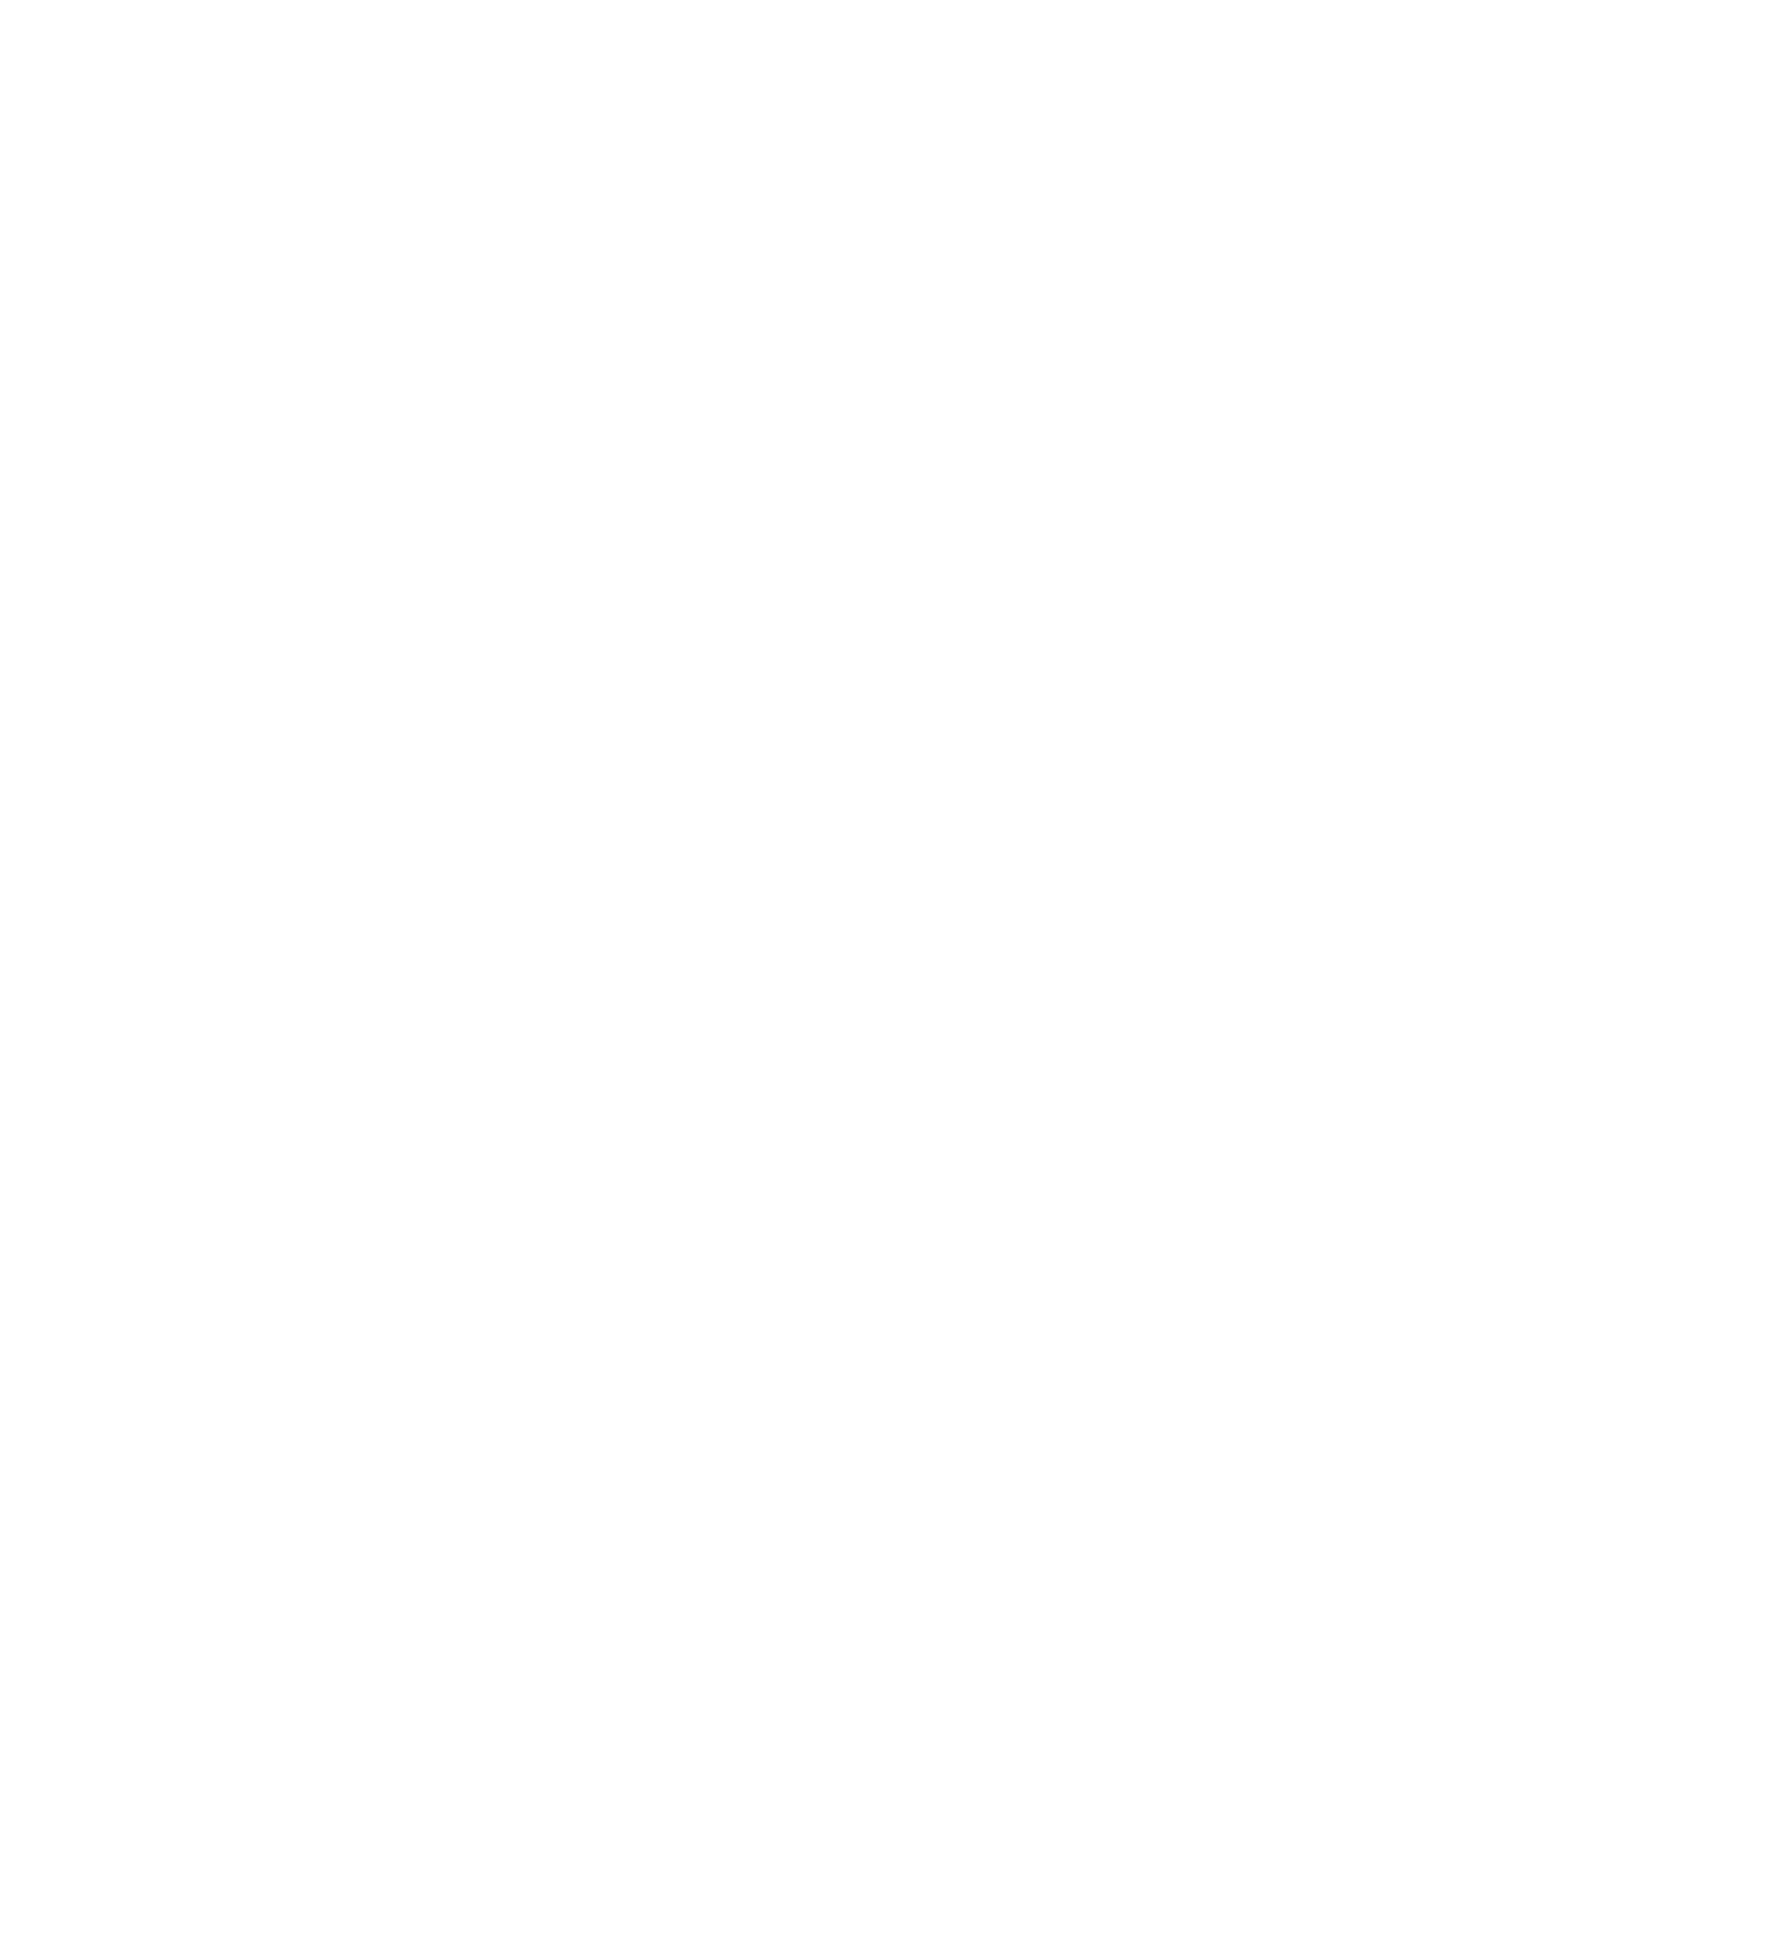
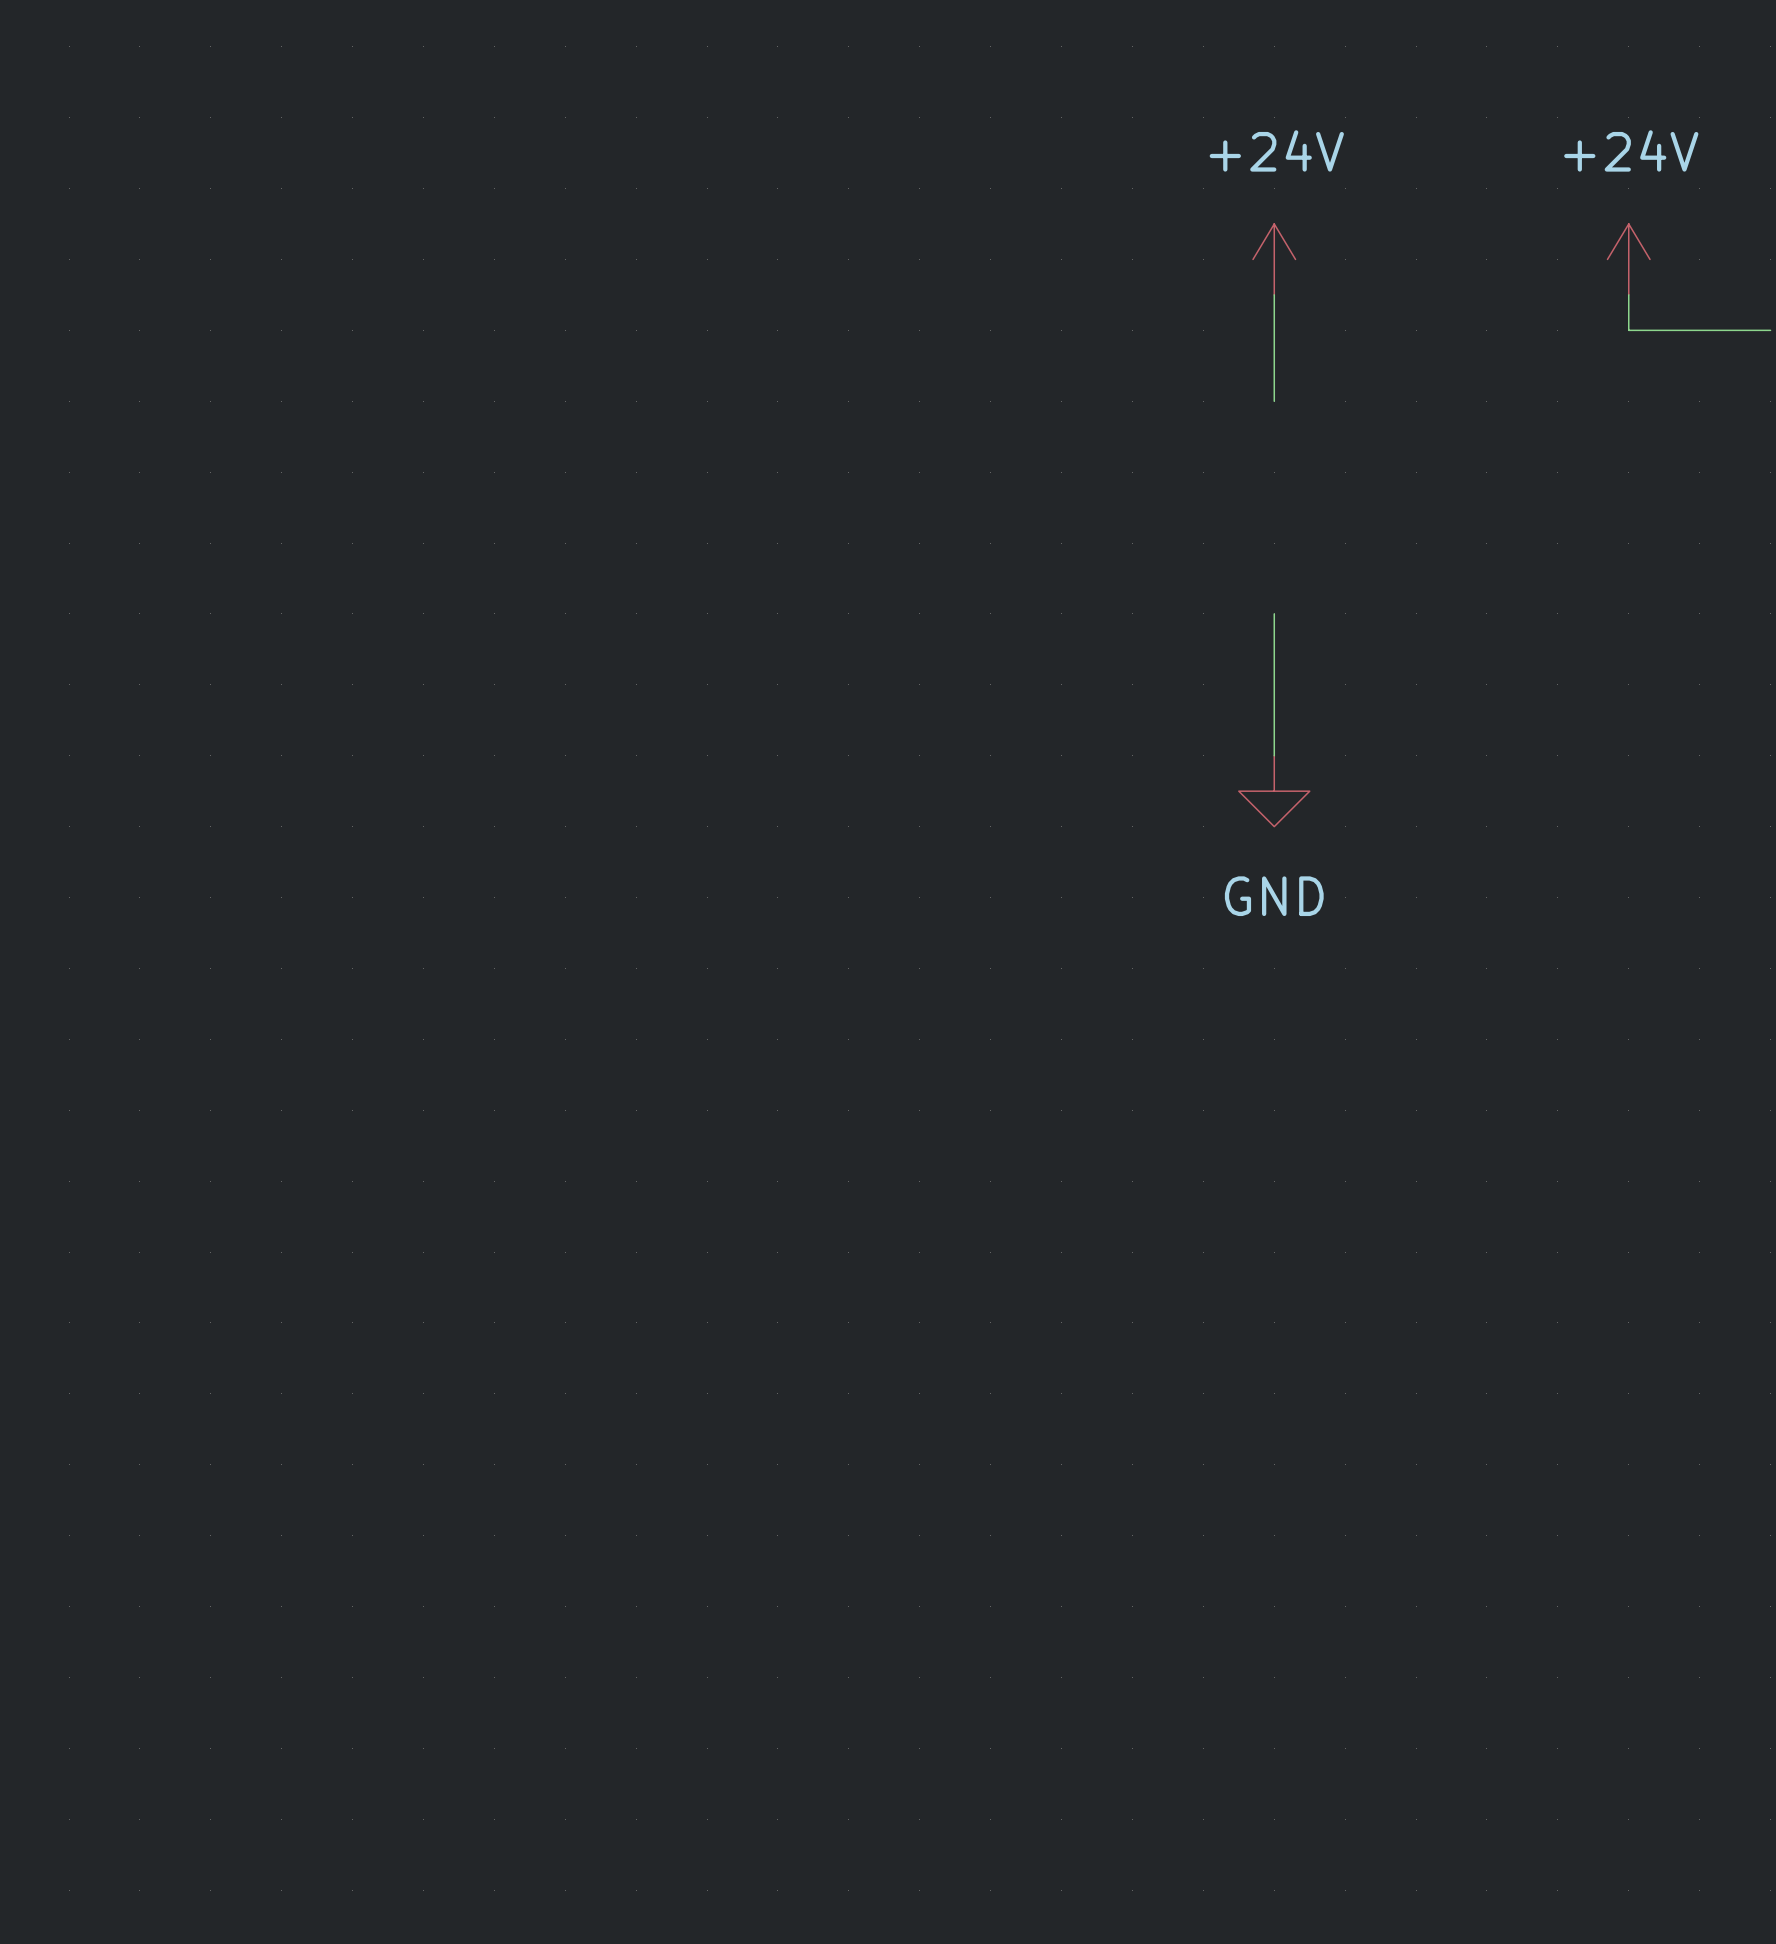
power symbol: none -> +24V (1274, 259)
power symbol: none -> +24V (1628, 259)
wire: none -> (1274, 294) (1274, 401)
wire: none -> (1628, 294) (1628, 330) (1770, 330)
wire: none -> (1274, 613) (1274, 755)
power symbol: none -> GND (1274, 791)

